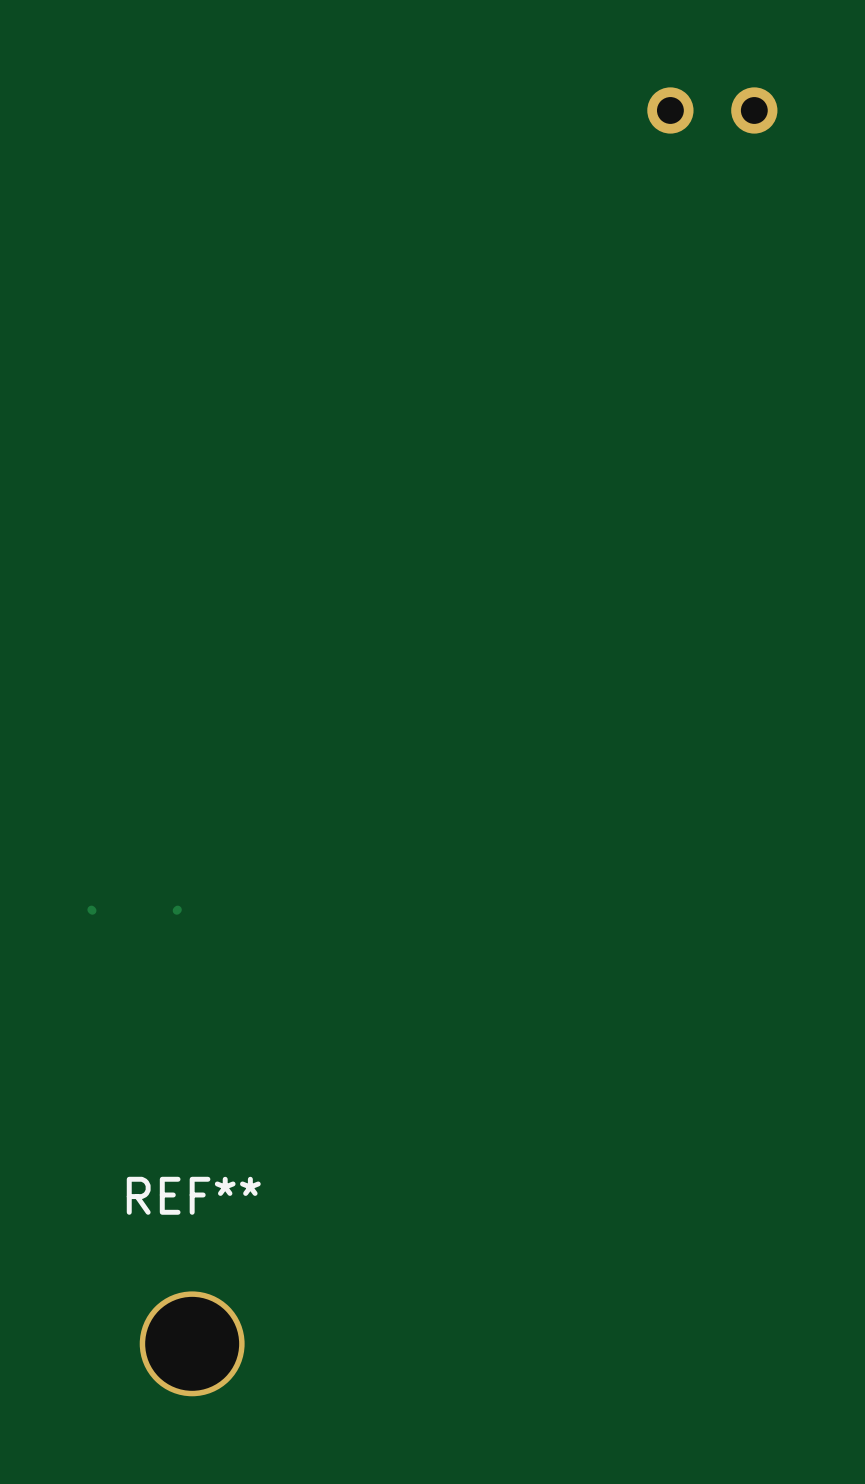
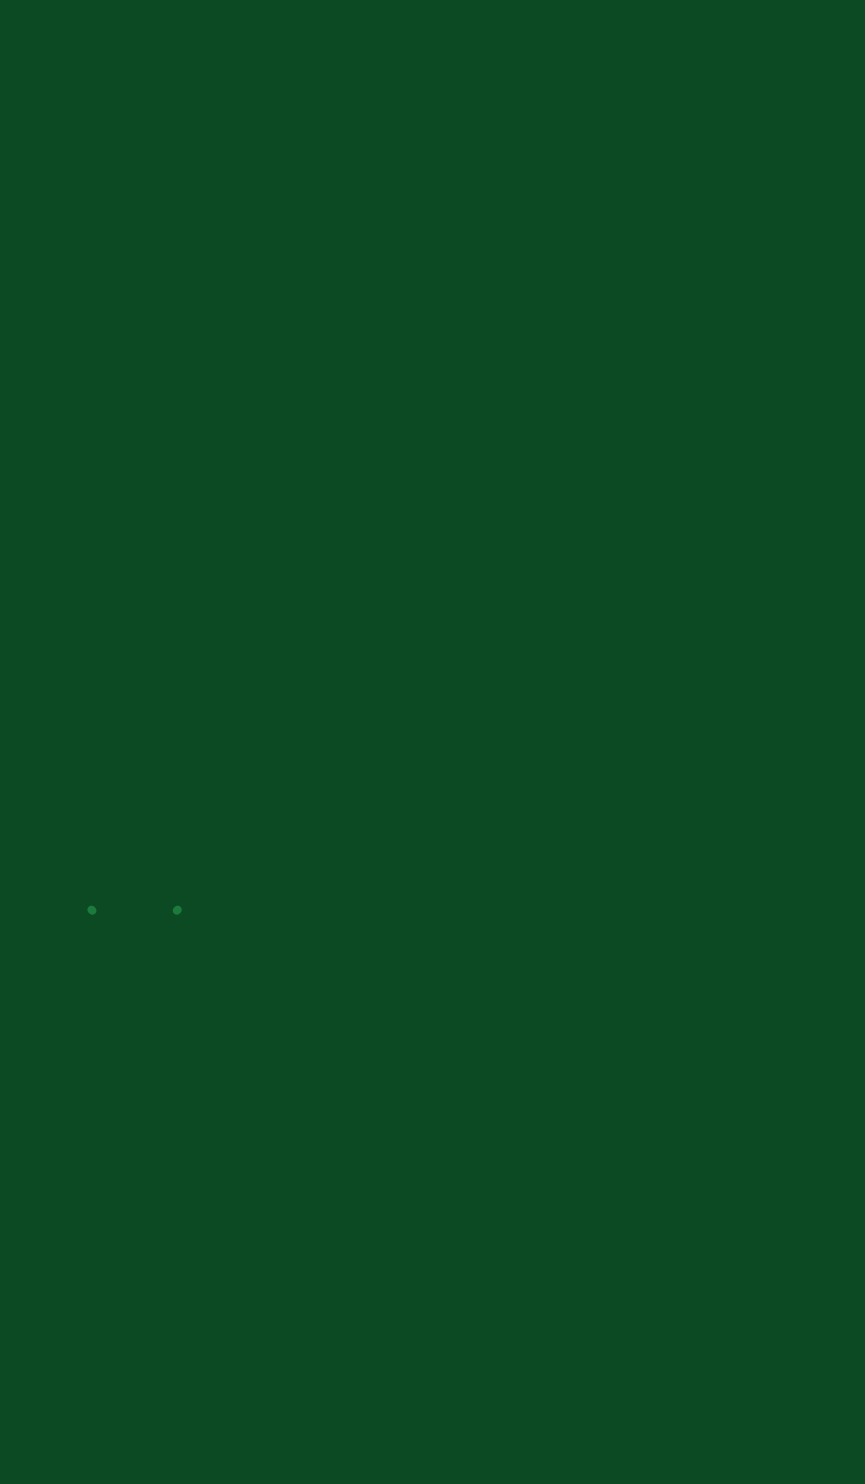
part: (712, 110) -> none
REF**: (192, 1343) -> none

